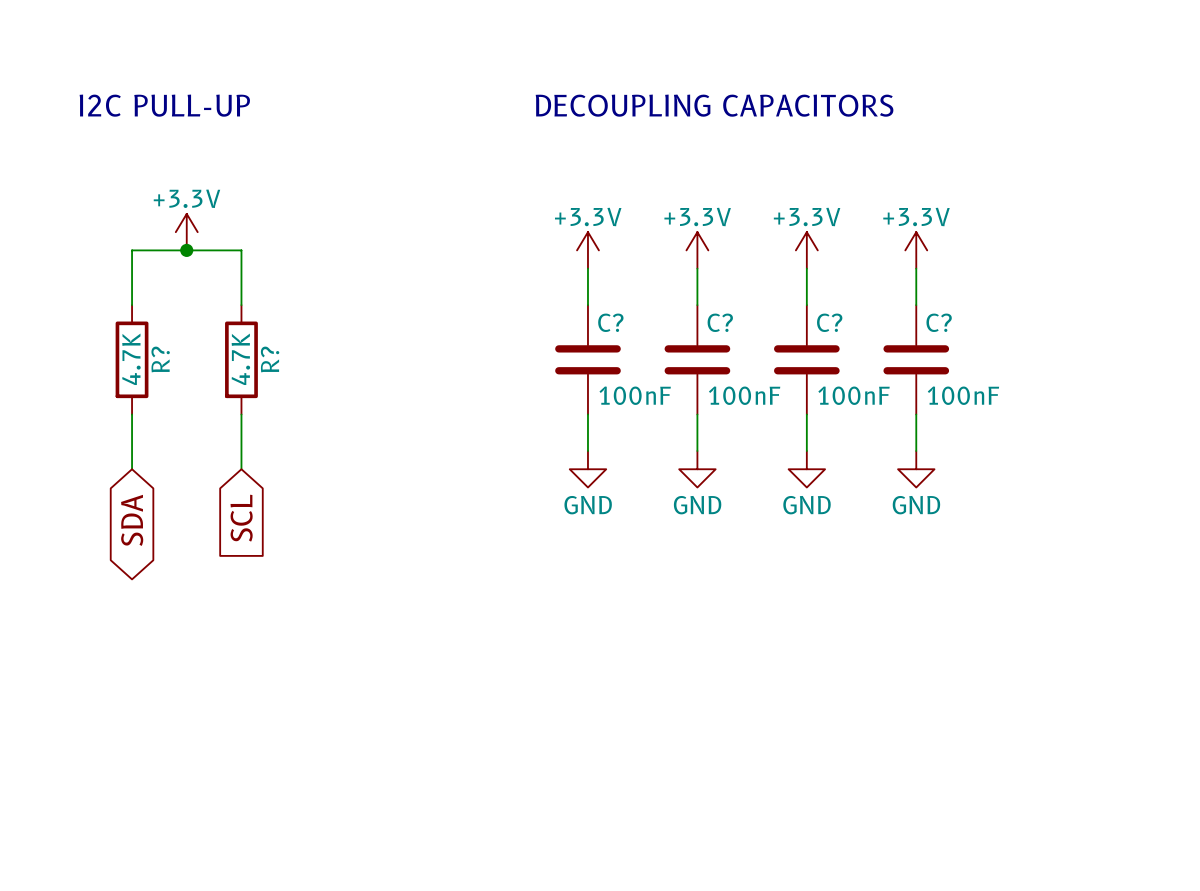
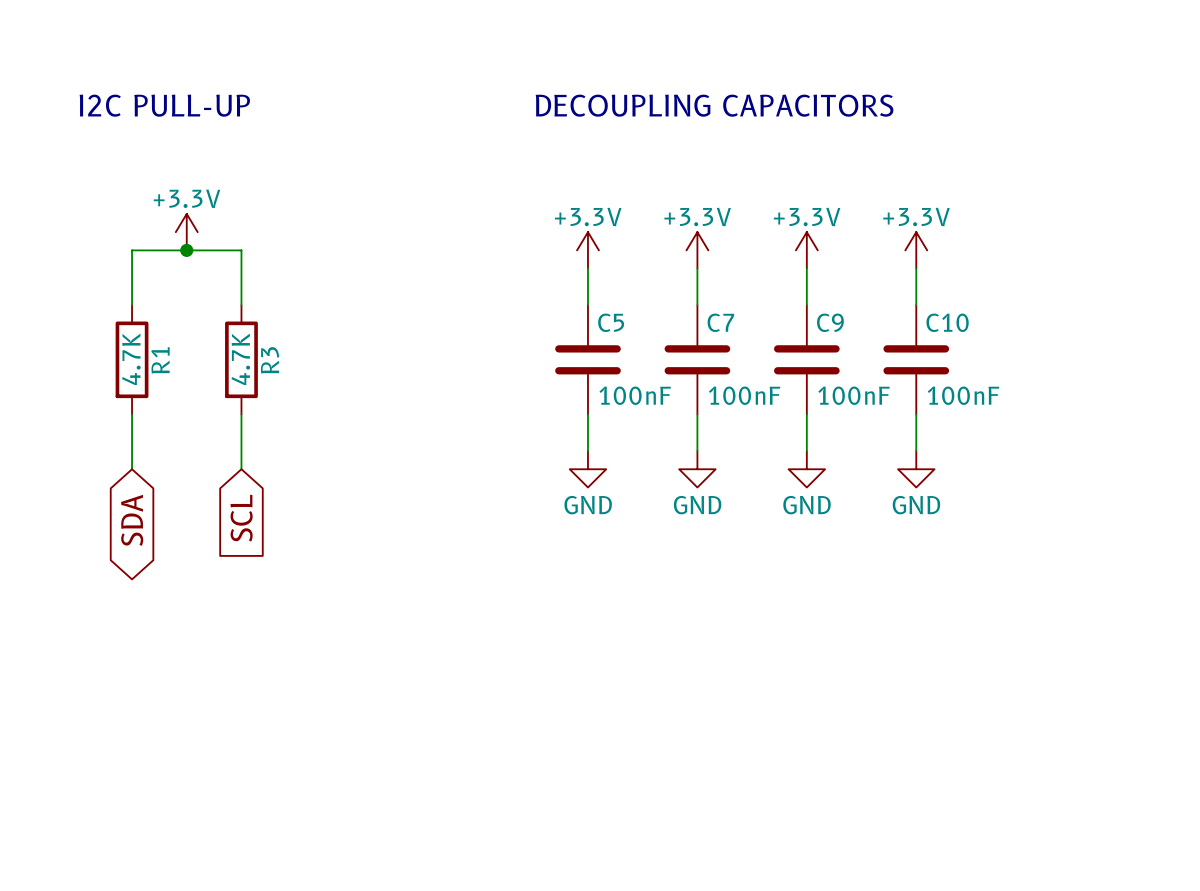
C? name: C? (610, 322) -> C5 (611, 322)
C? name: C? (720, 322) -> C7 (720, 322)
C? name: C? (829, 322) -> C9 (830, 322)
C? name: C? (939, 322) -> C10 (947, 322)
R? name: R? (160, 359) -> R1 (160, 360)
R? name: R? (270, 359) -> R3 (270, 360)

